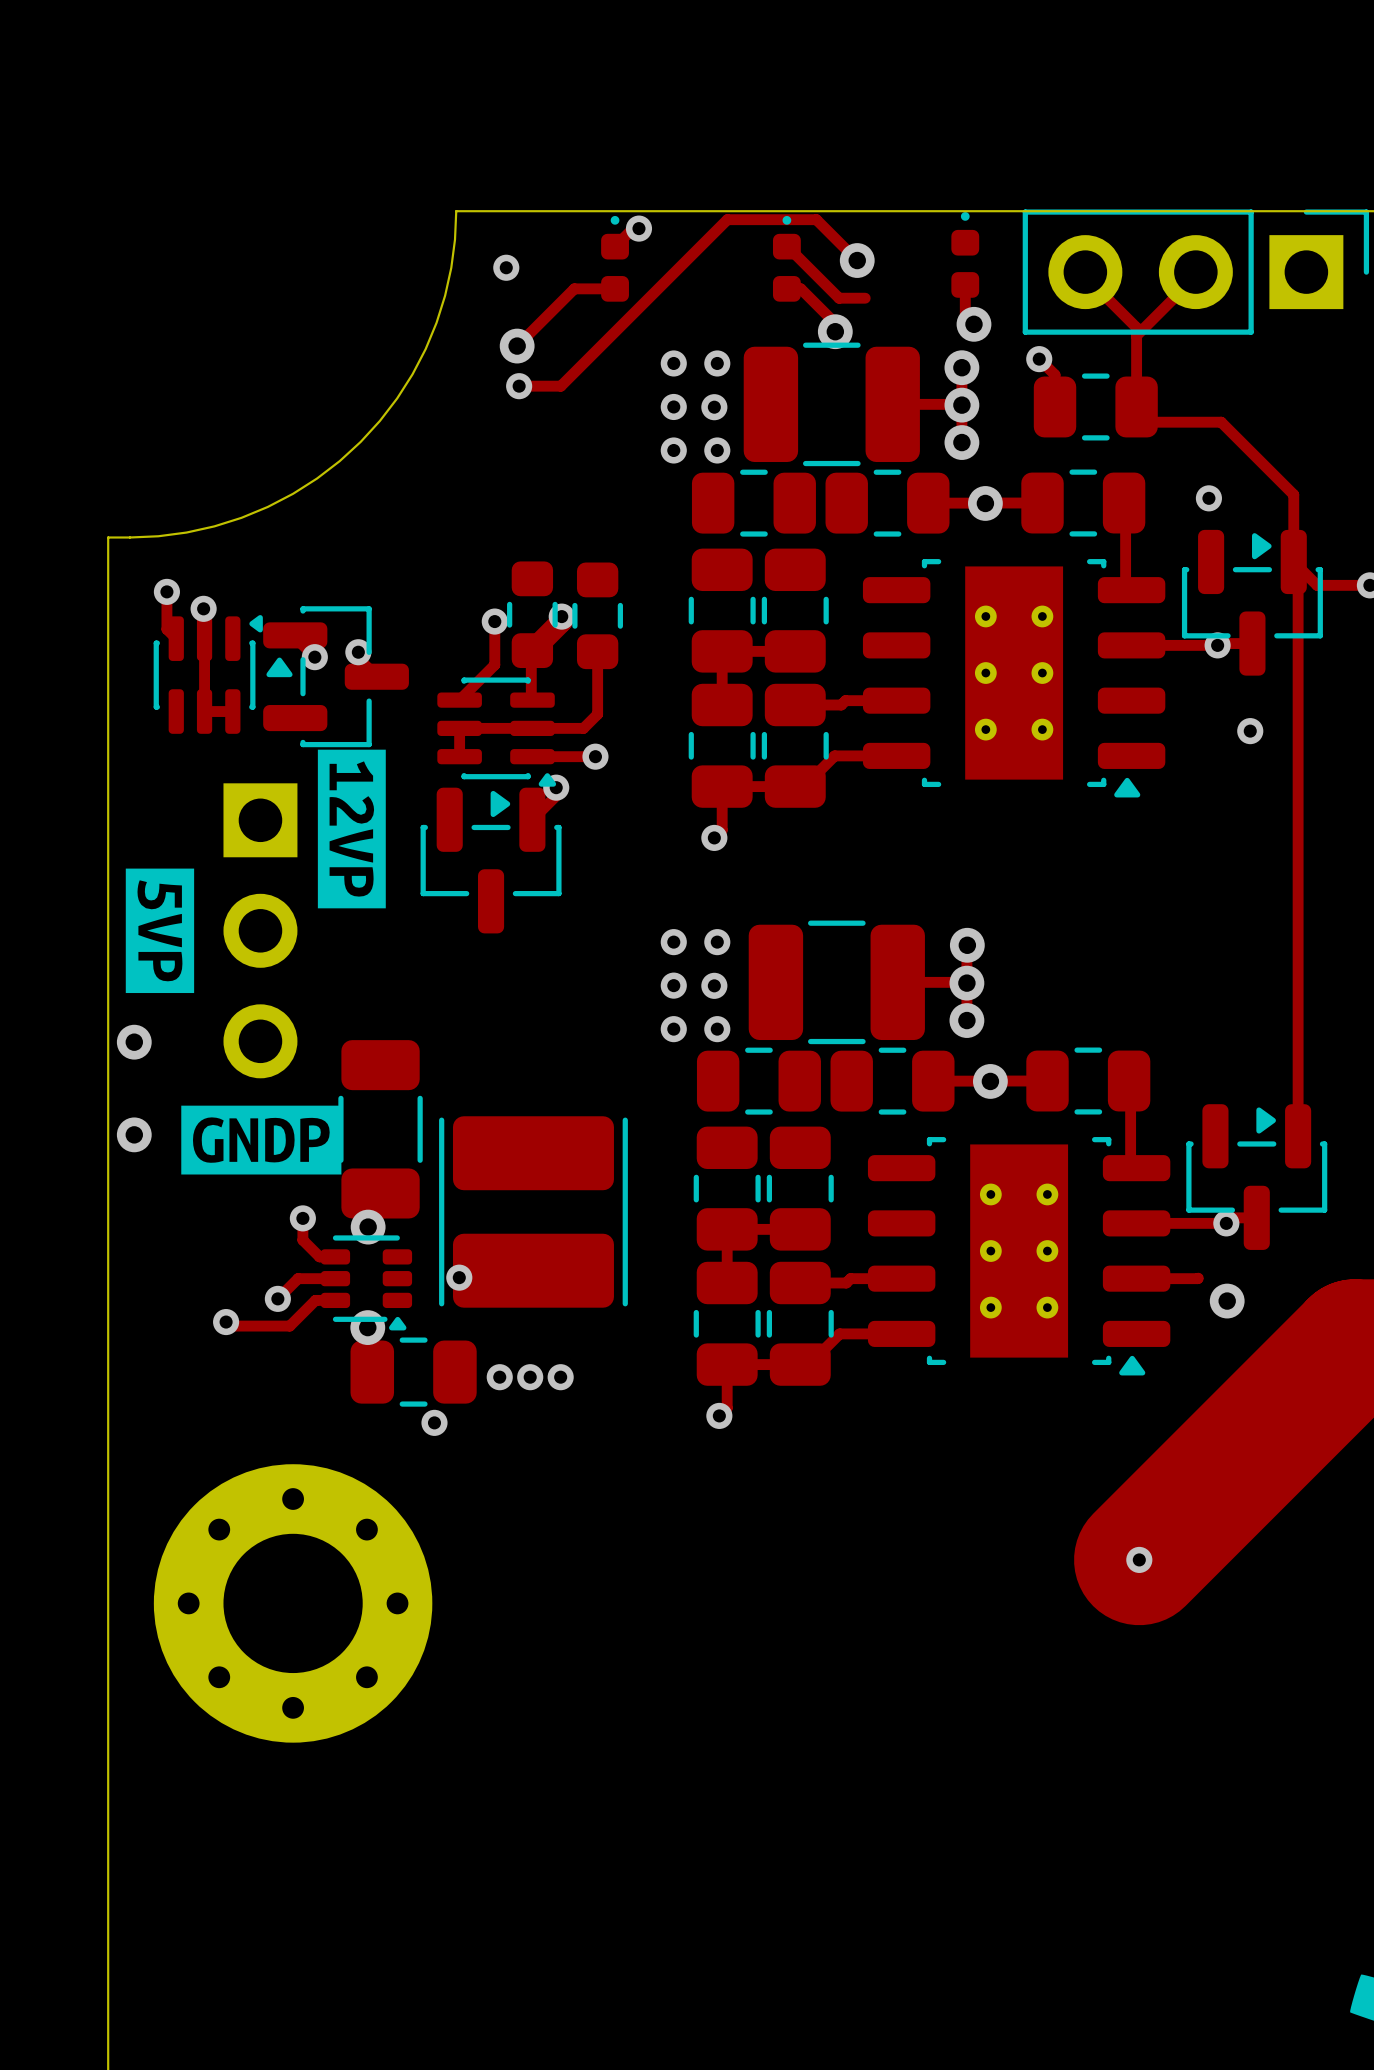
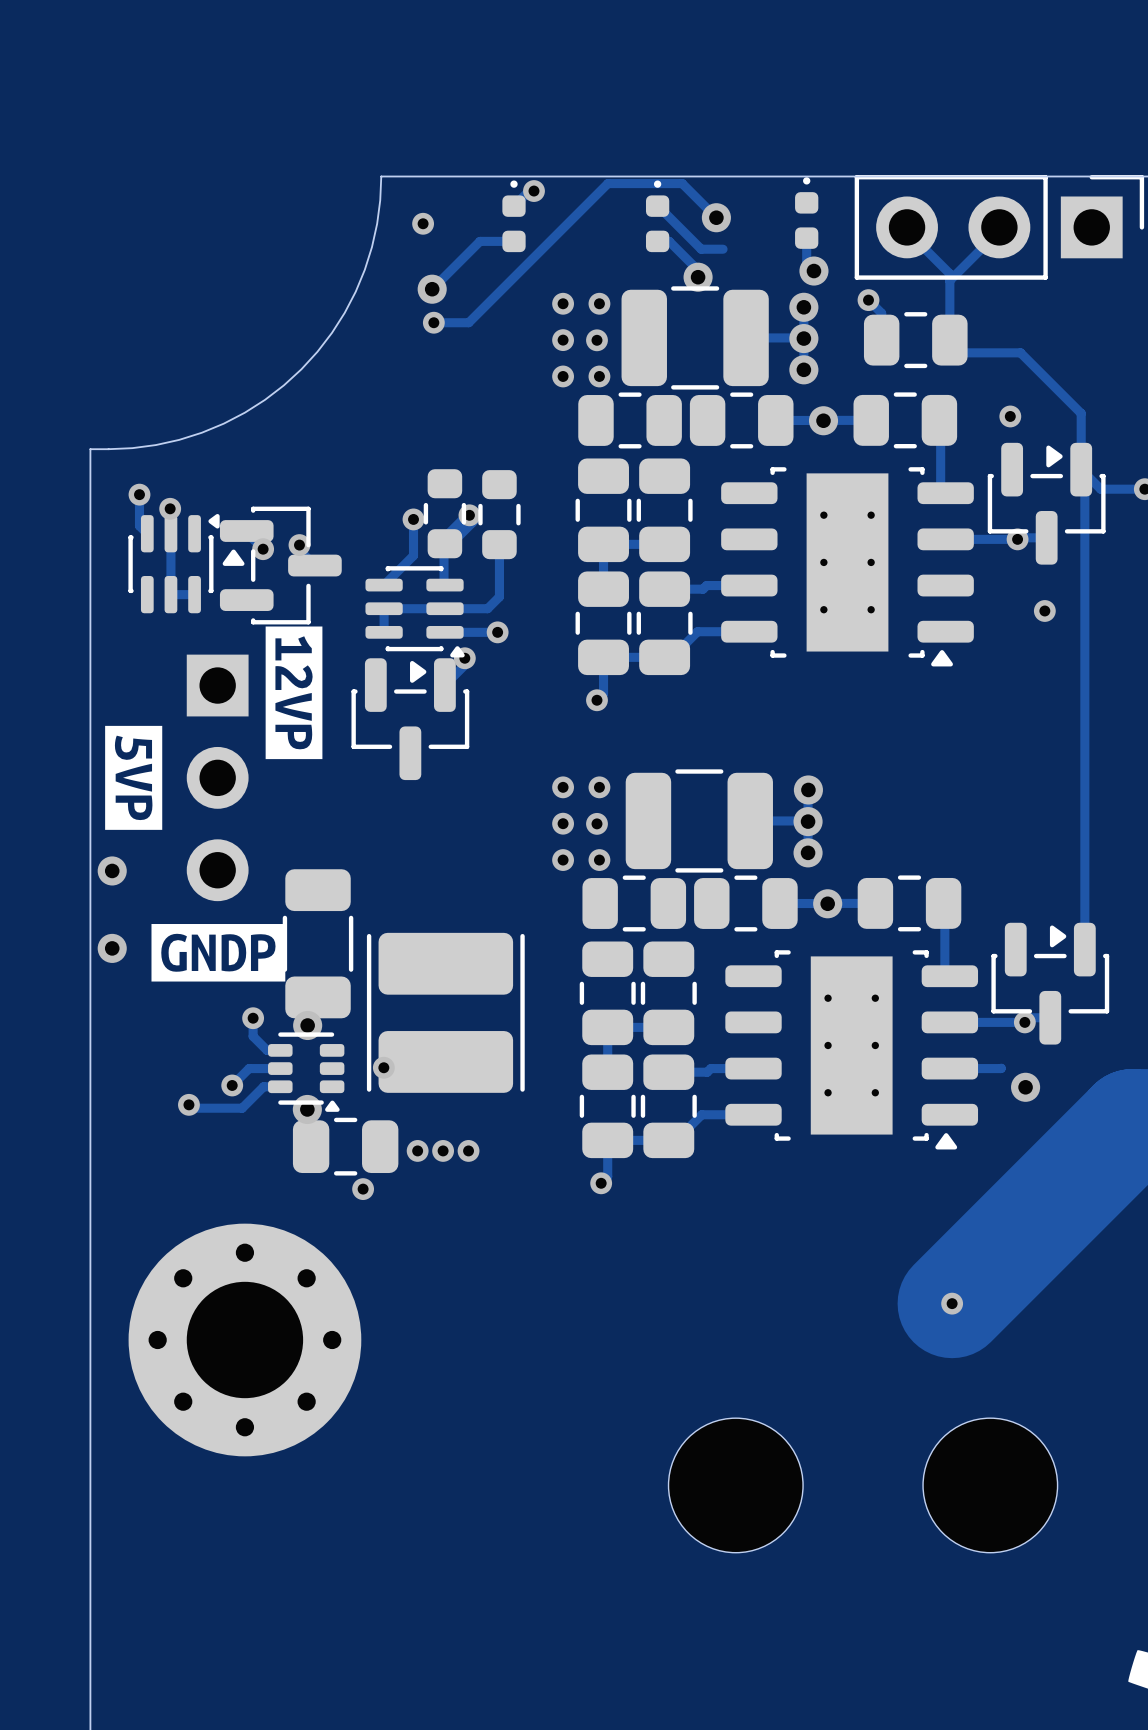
part: none -> (735, 1485)
part: none -> (990, 1485)

